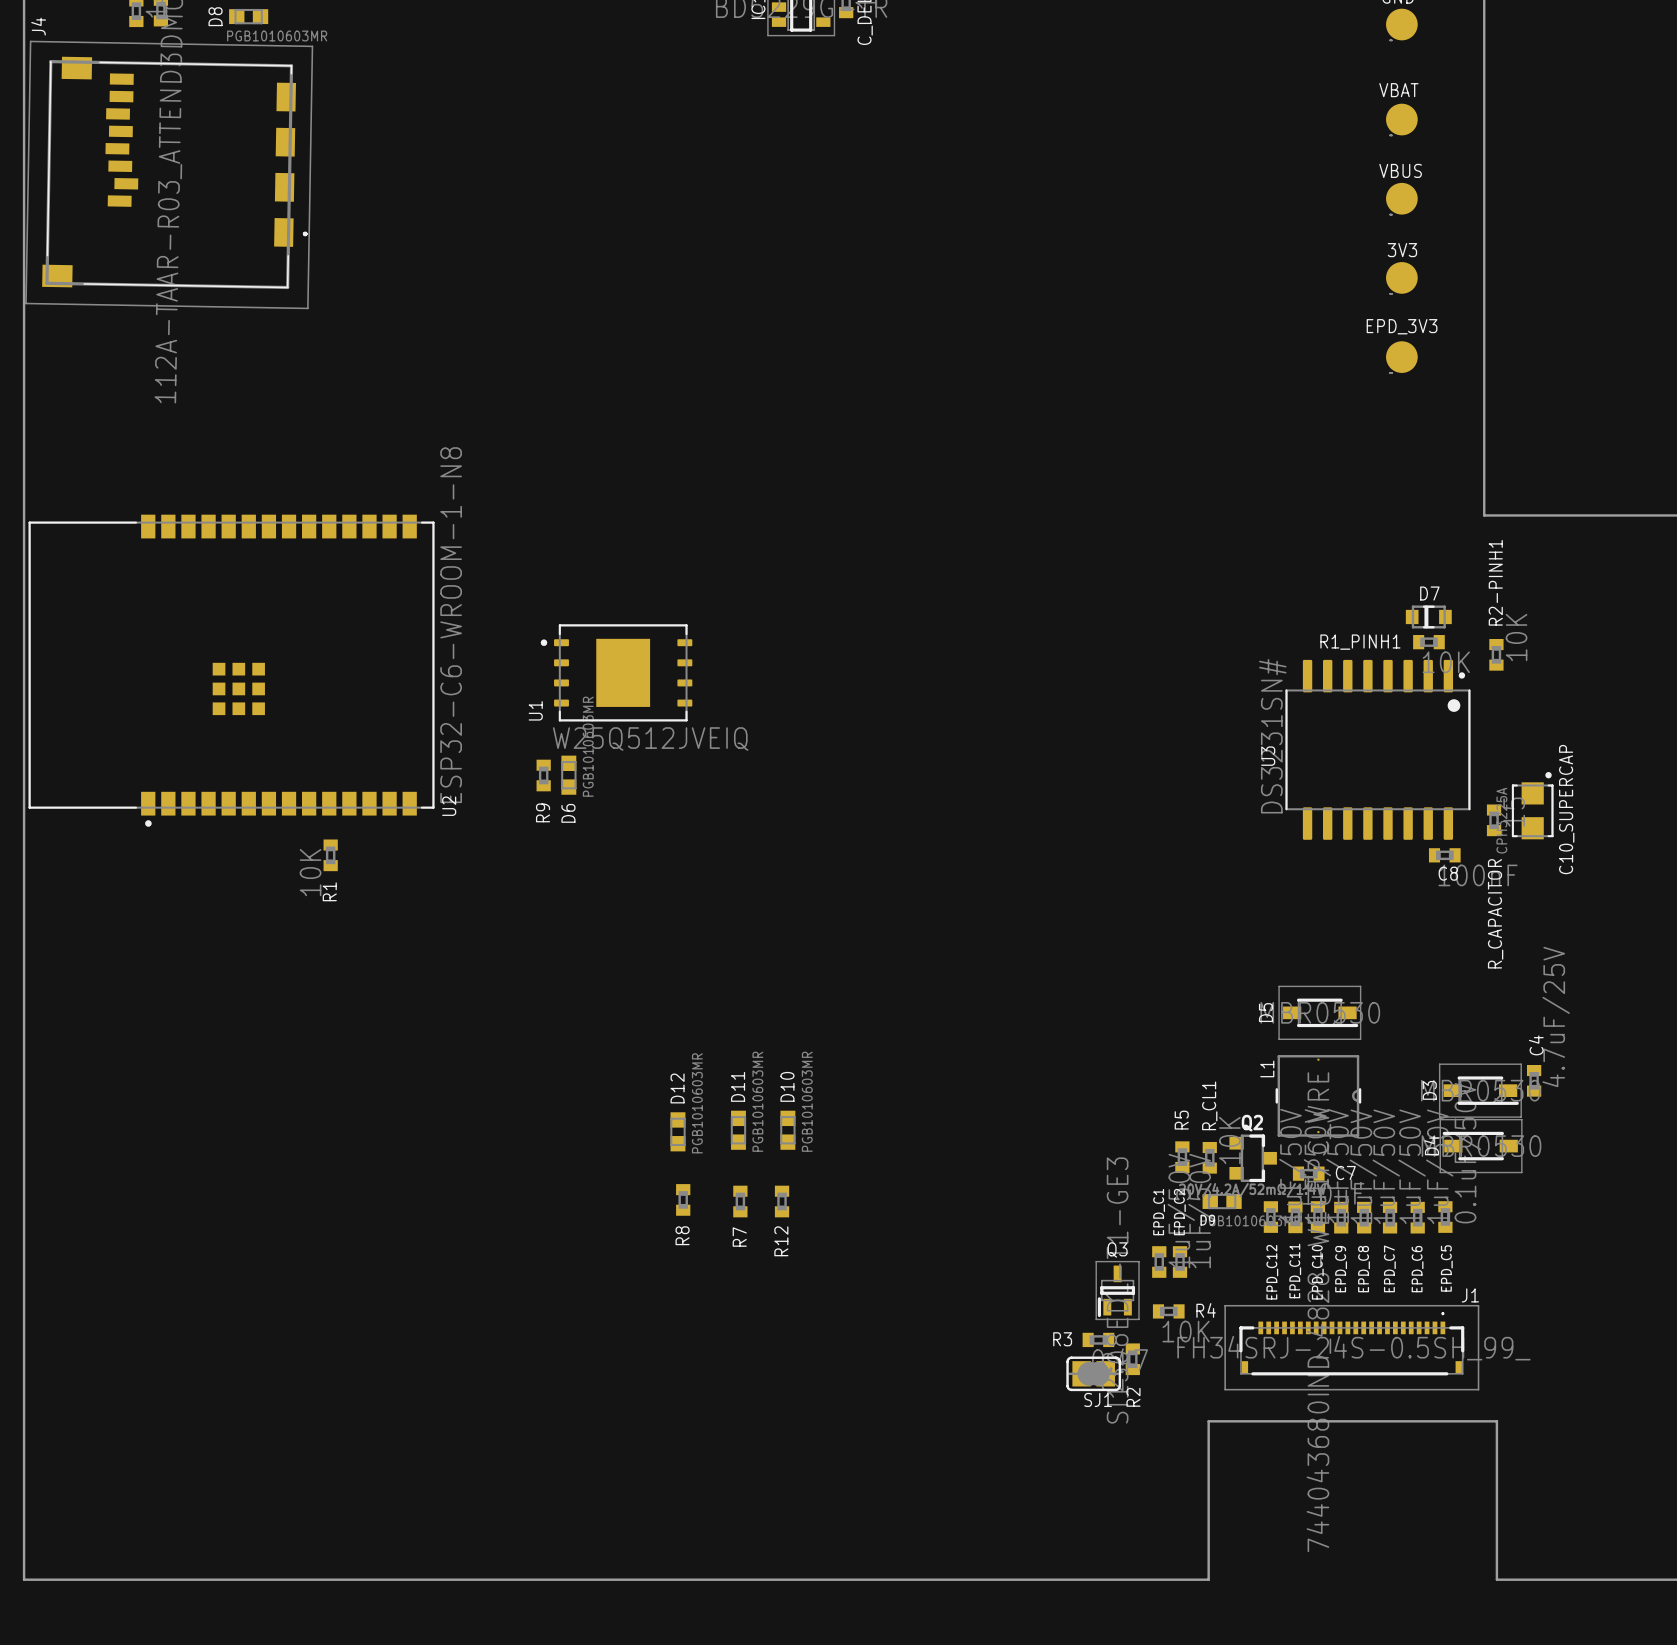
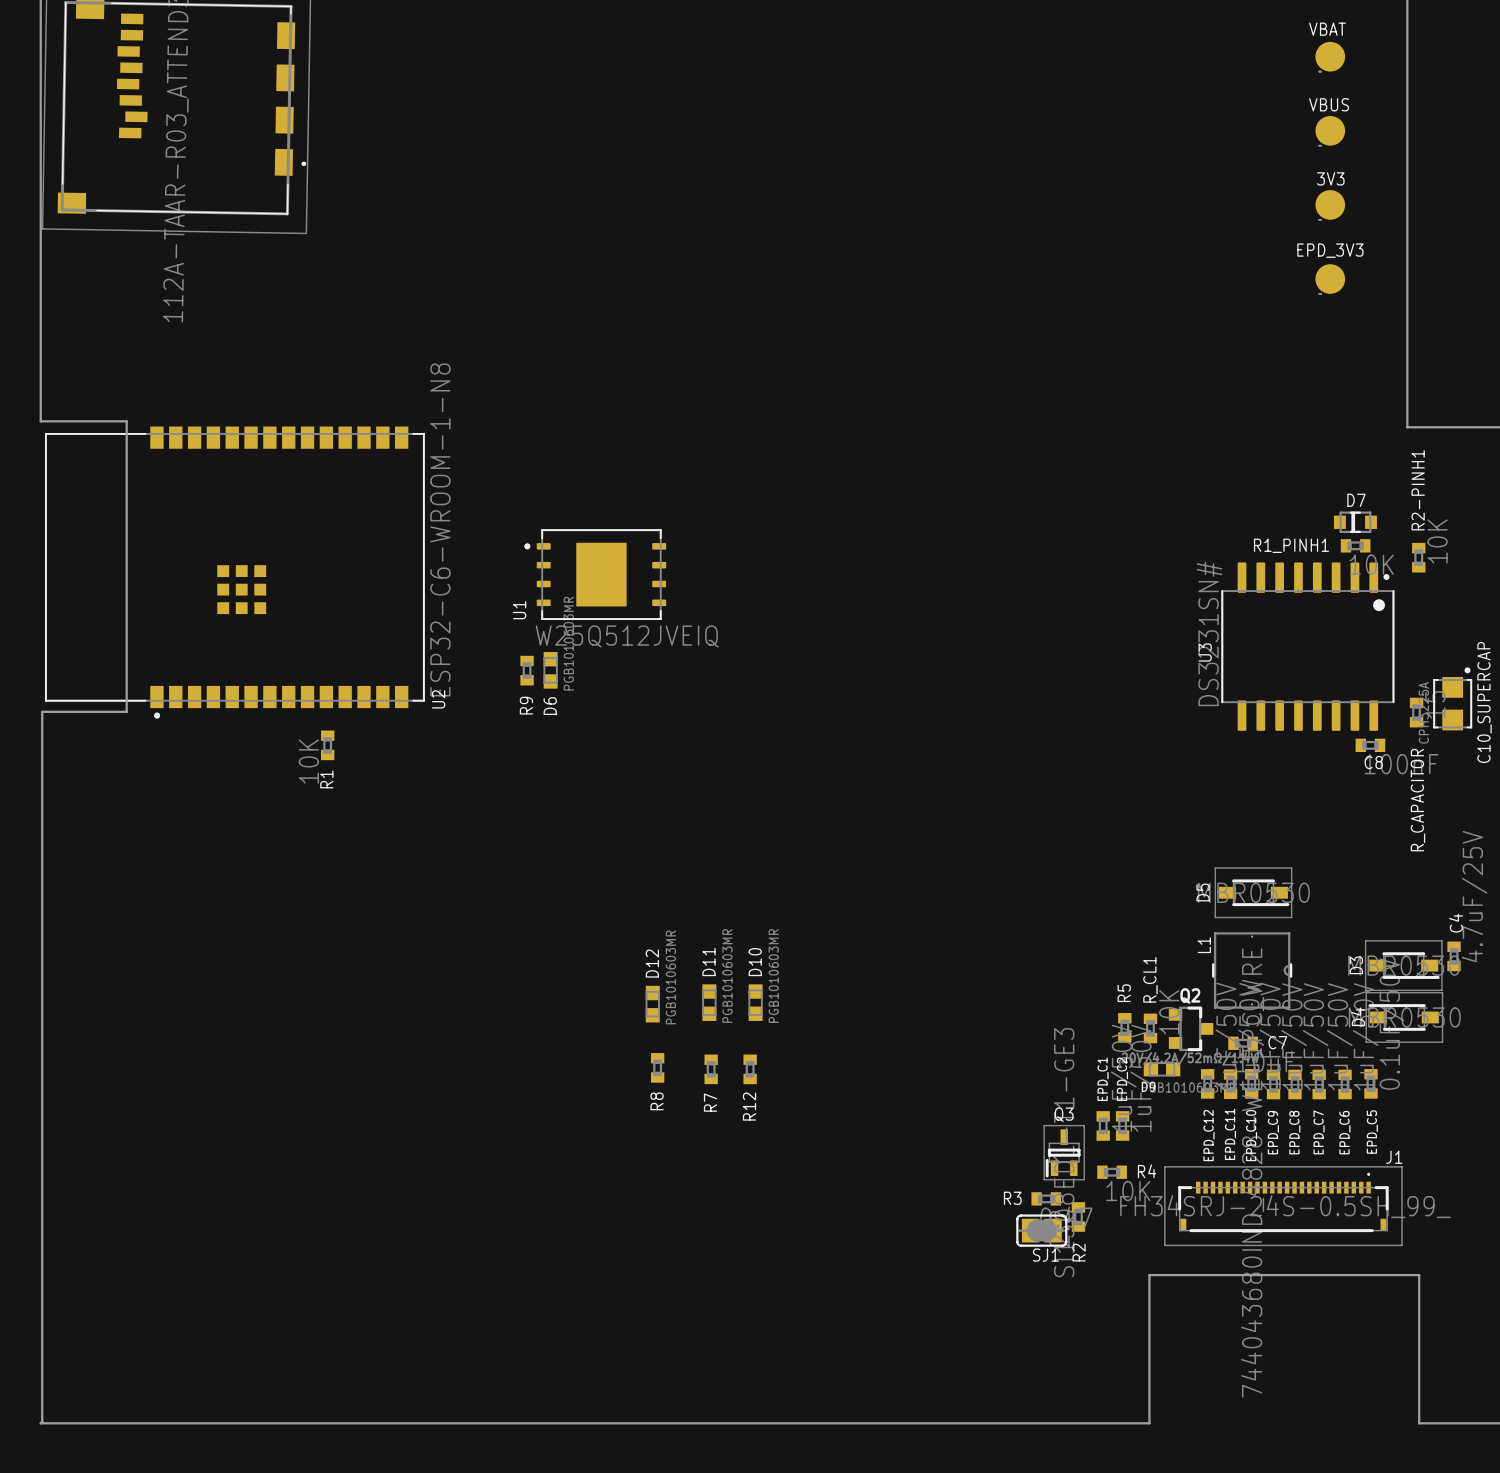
board edge: (24, 509) (24, 1579) -> (40, 421) (126, 421) (126, 711) (42, 711) (40, 1423)

